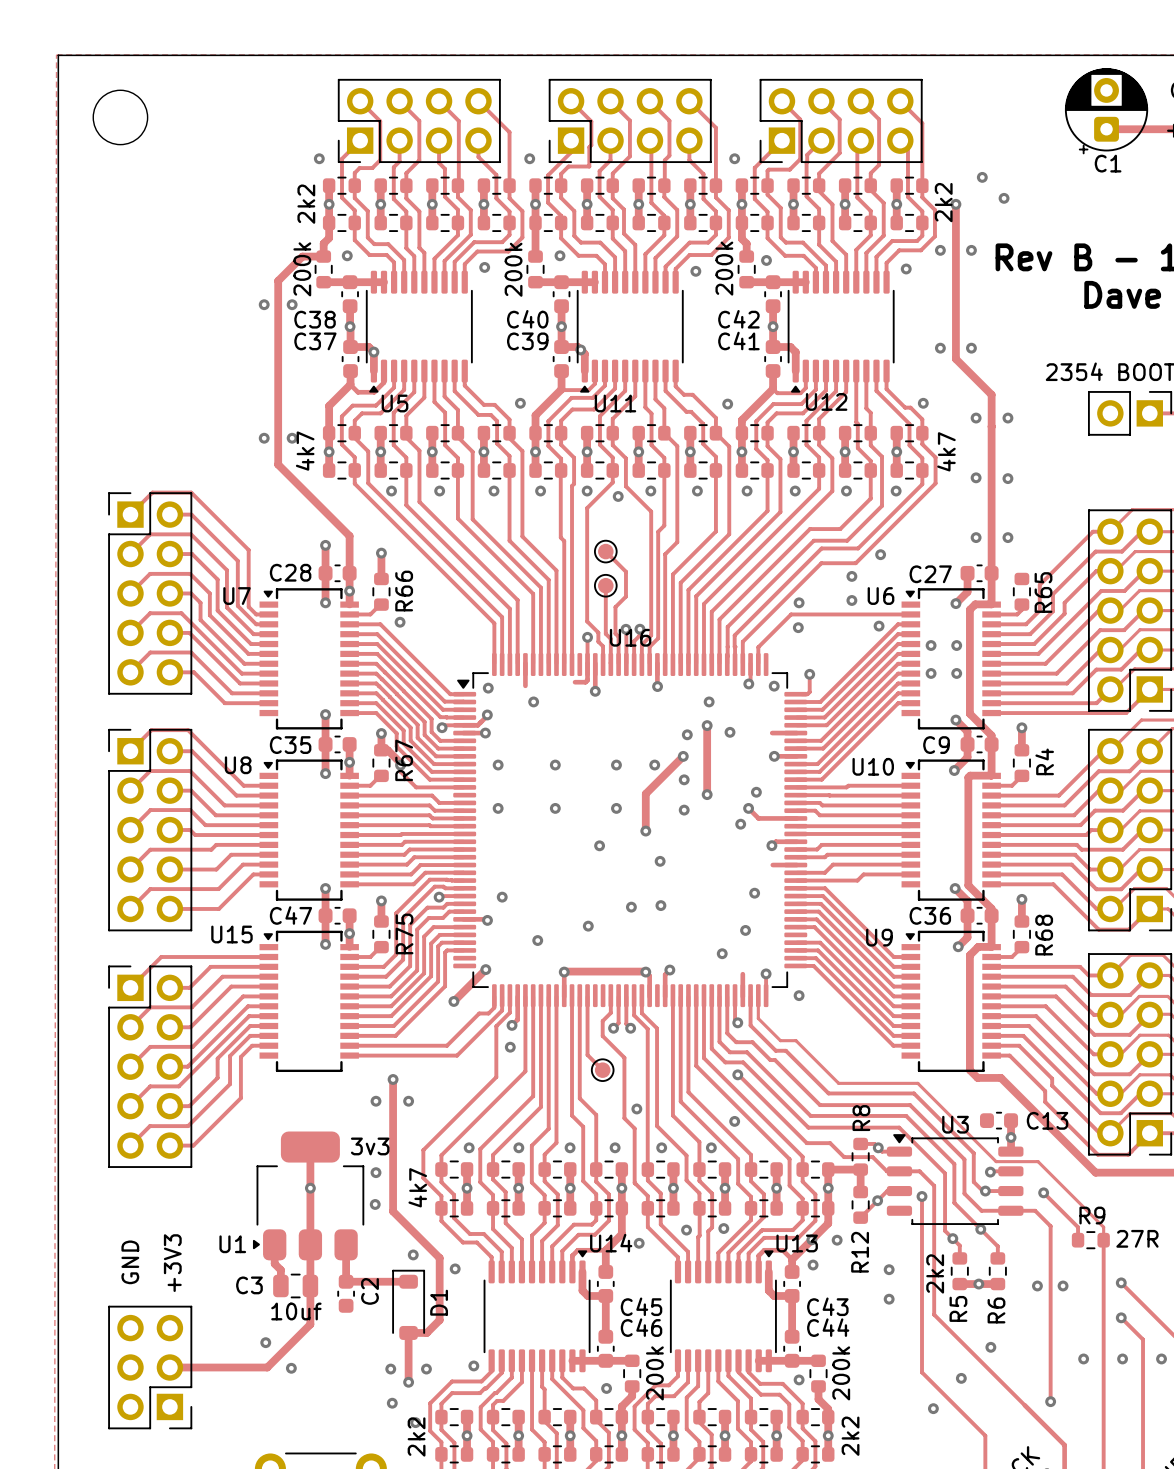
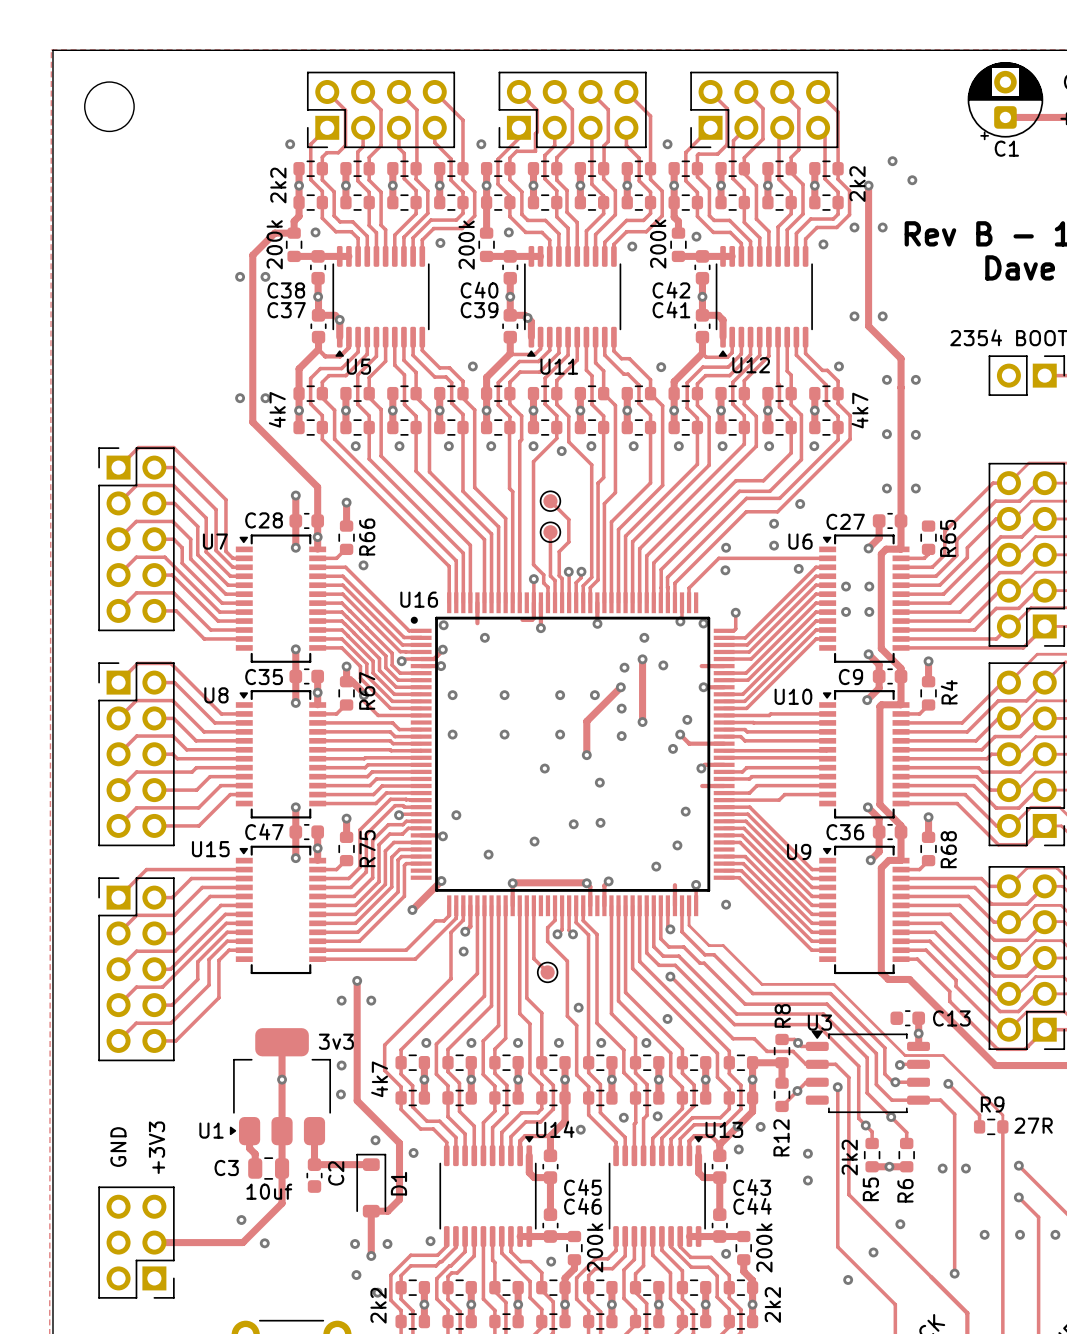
U16 name position: U16 (630, 637) -> U16 (419, 599)
U16 footprint: [453, 653, 808, 1008] -> [410, 592, 735, 917]
U3 name position: U3 (955, 1124) -> U3 (819, 1022)

